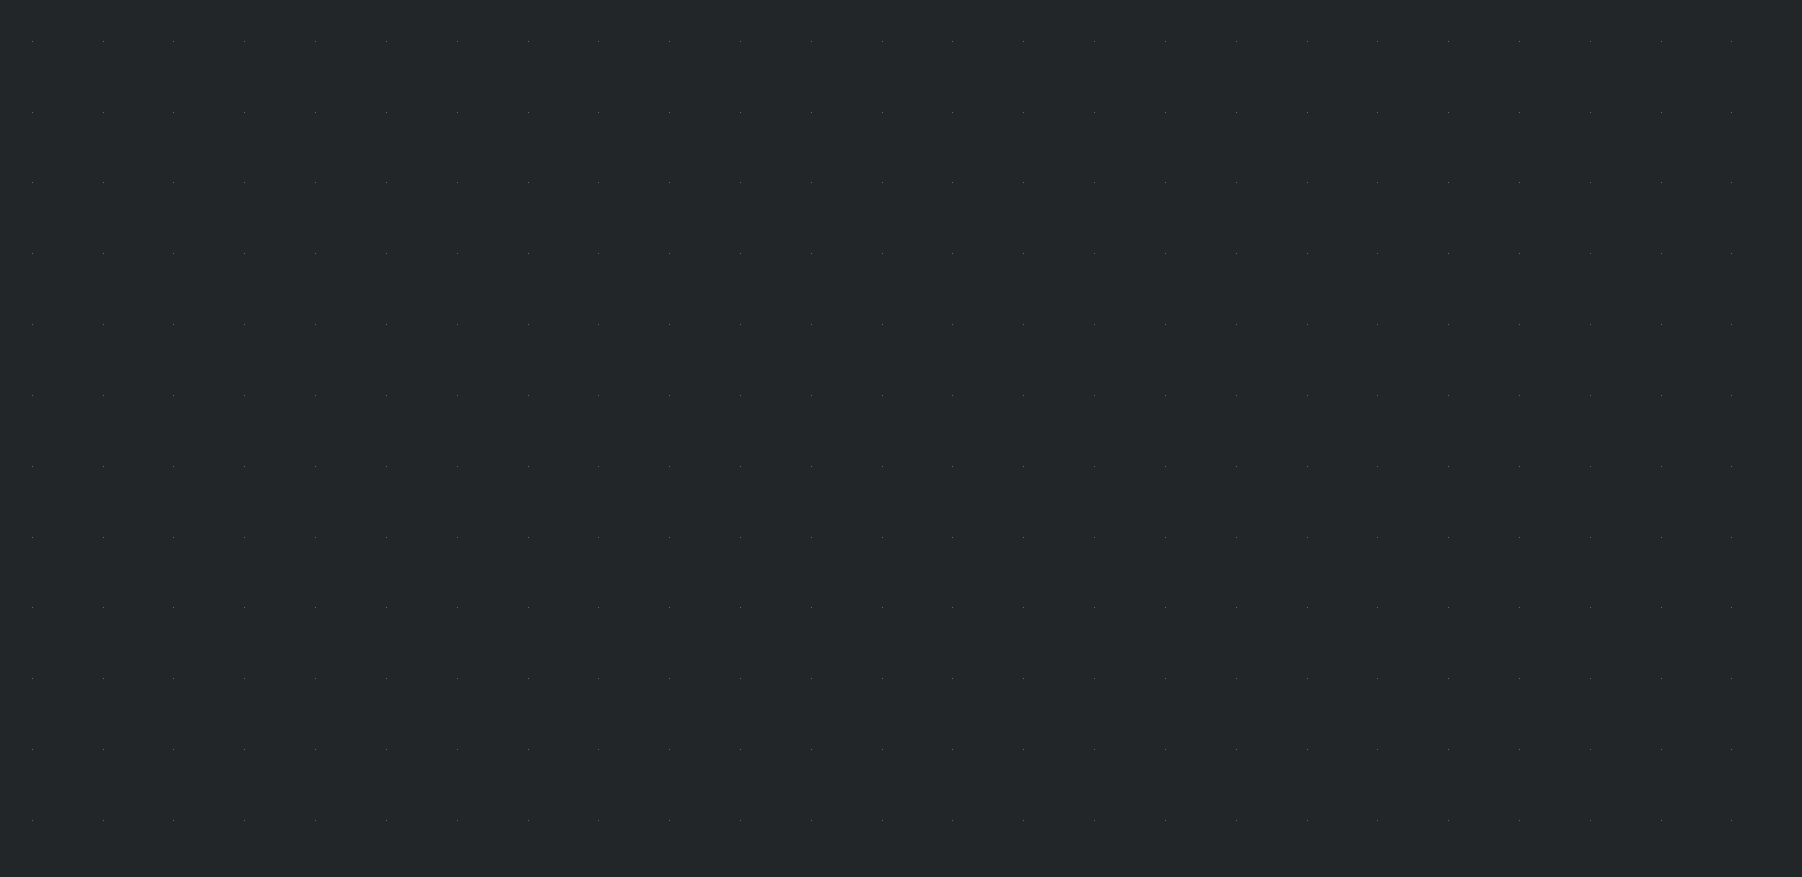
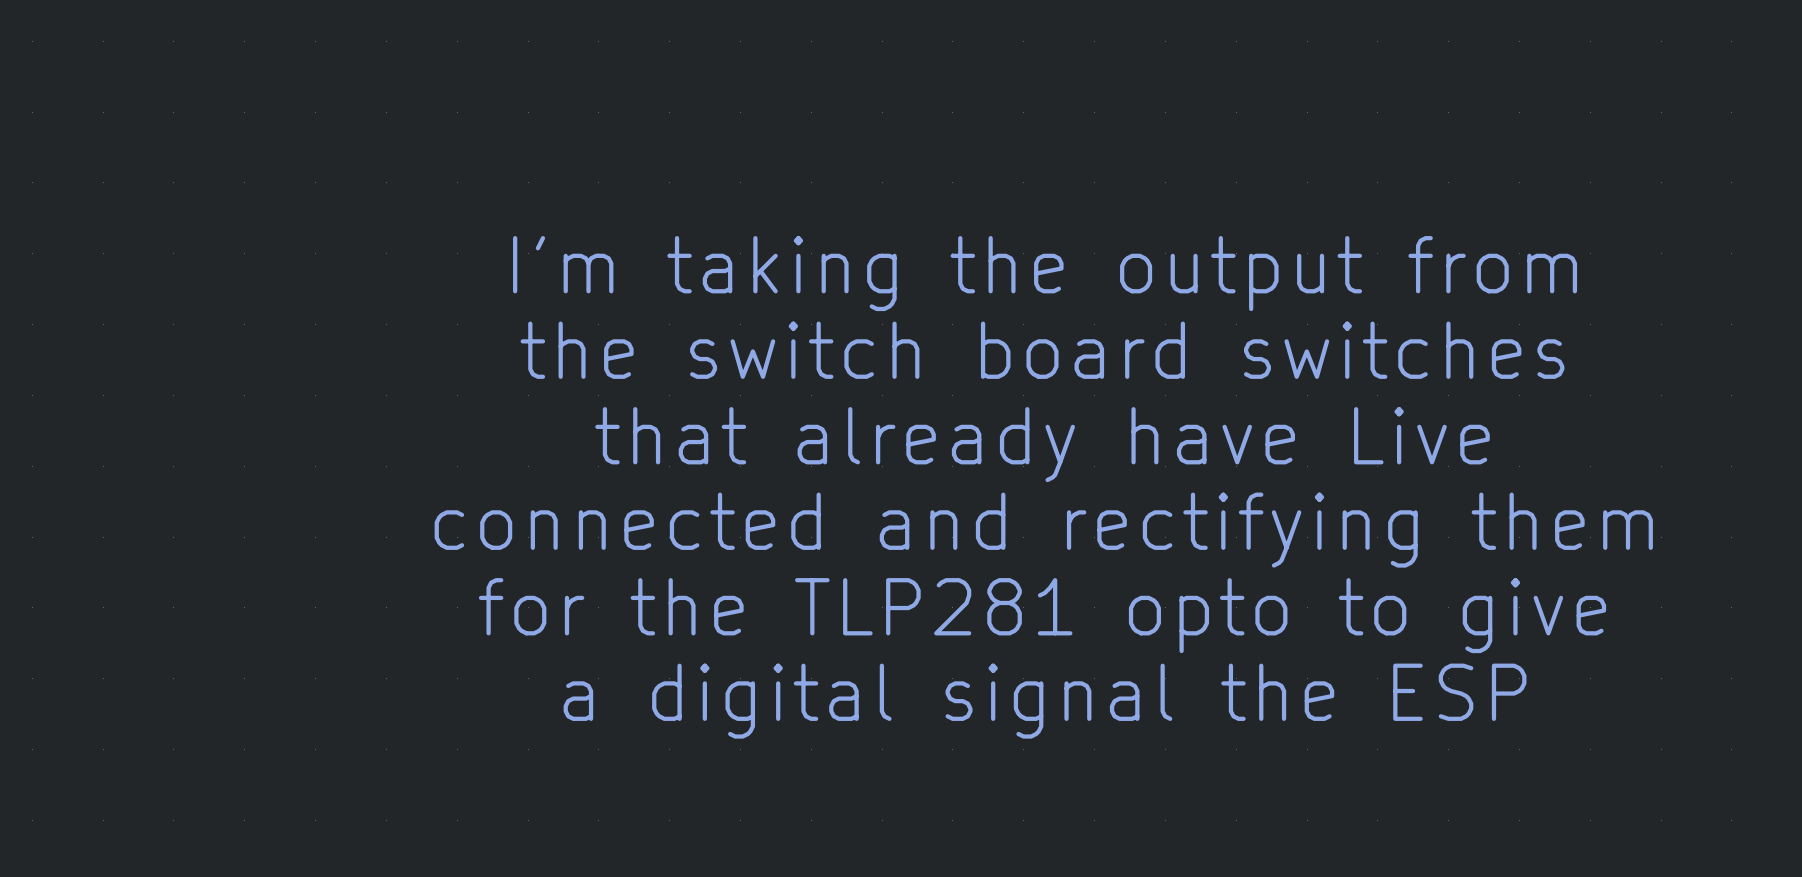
text: none -> I'm taking the output from (1045, 273)
text: none -> the switch board switches (1042, 350)
text: none -> that already have Live (1042, 444)
text: none -> connected and rectifying them (1043, 530)
text: none -> for the TLP281 opto to give (1042, 615)
text: none -> a digital signal the ESP (1045, 701)

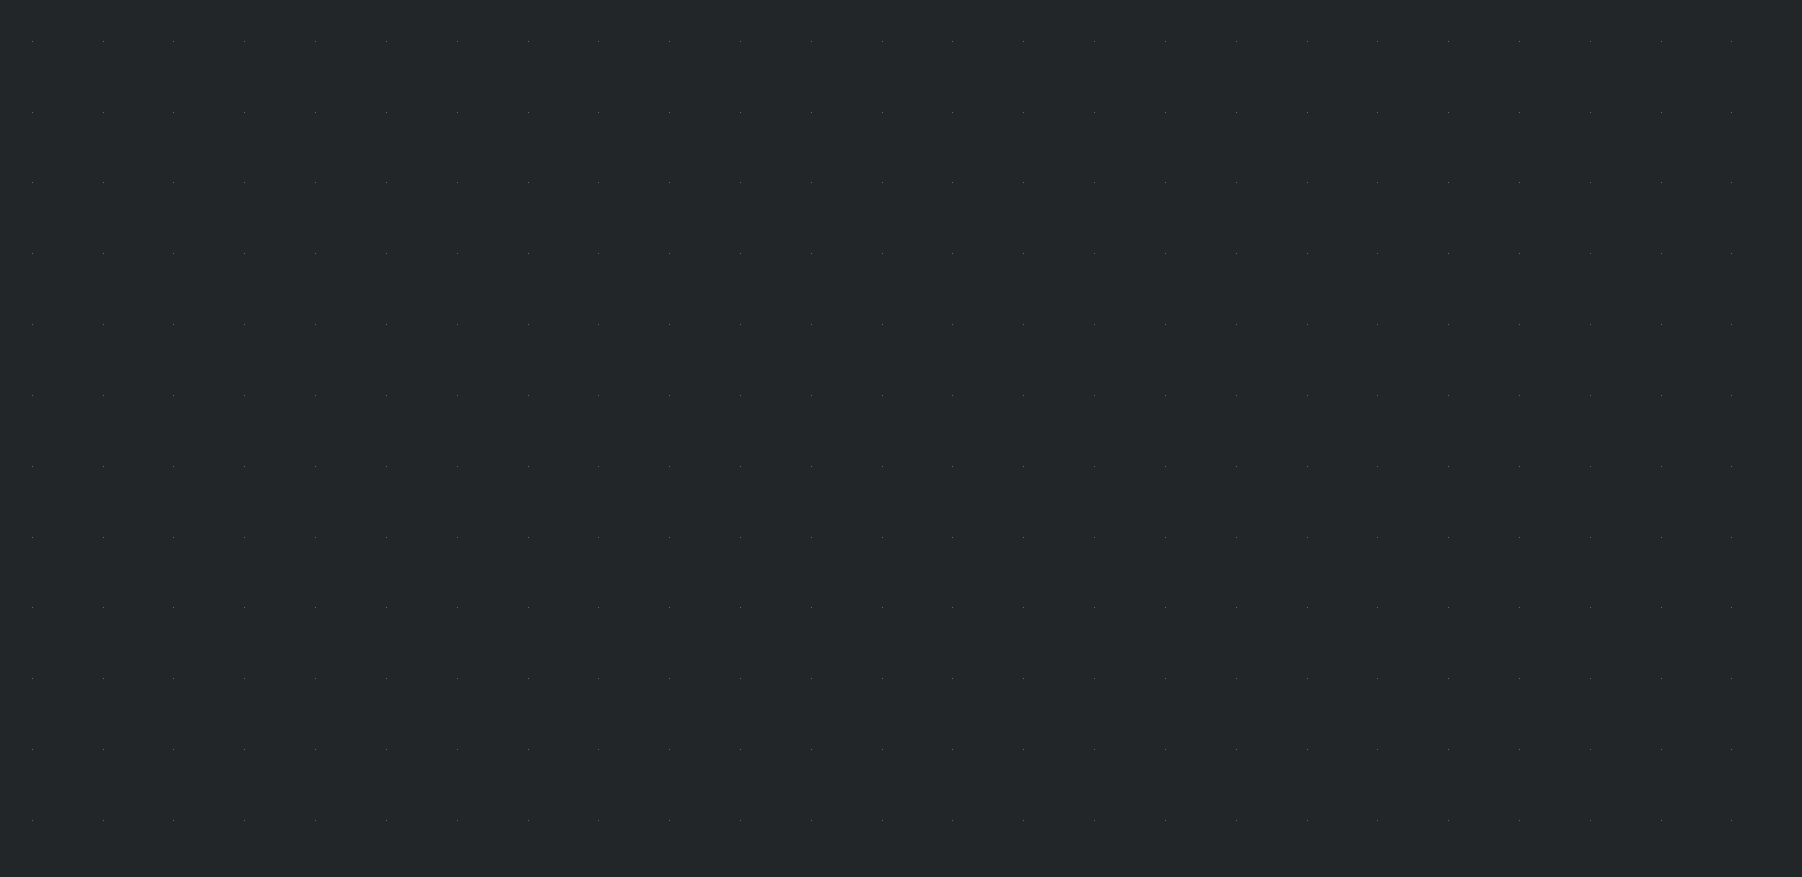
text: I'm taking the output from (1045, 273) -> none
text: the switch board switches (1042, 350) -> none
text: that already have Live (1042, 444) -> none
text: connected and rectifying them (1043, 530) -> none
text: for the TLP281 opto to give (1042, 615) -> none
text: a digital signal the ESP (1045, 701) -> none

